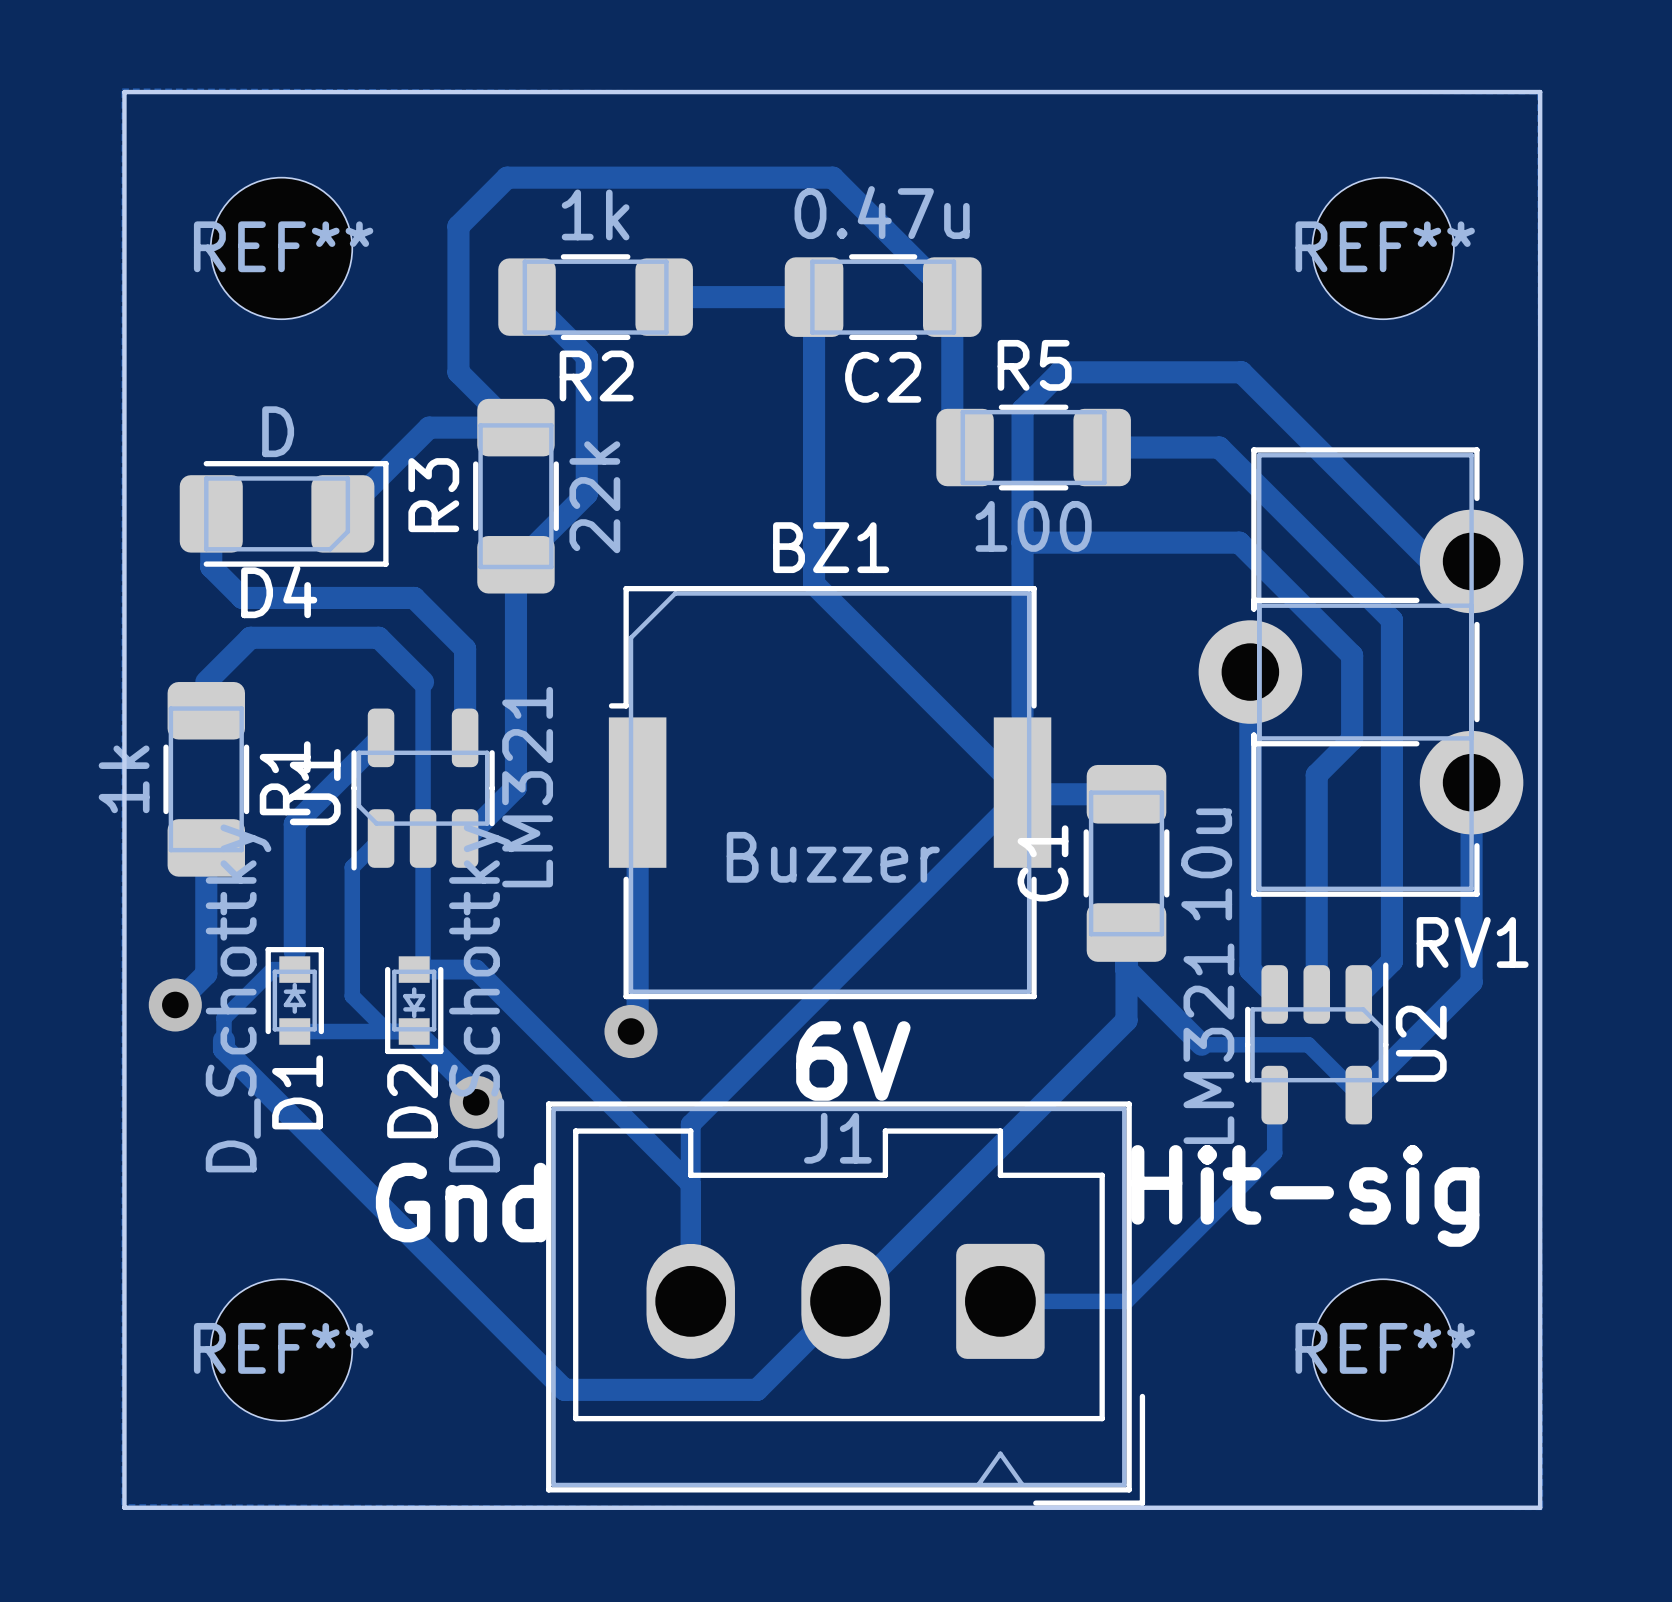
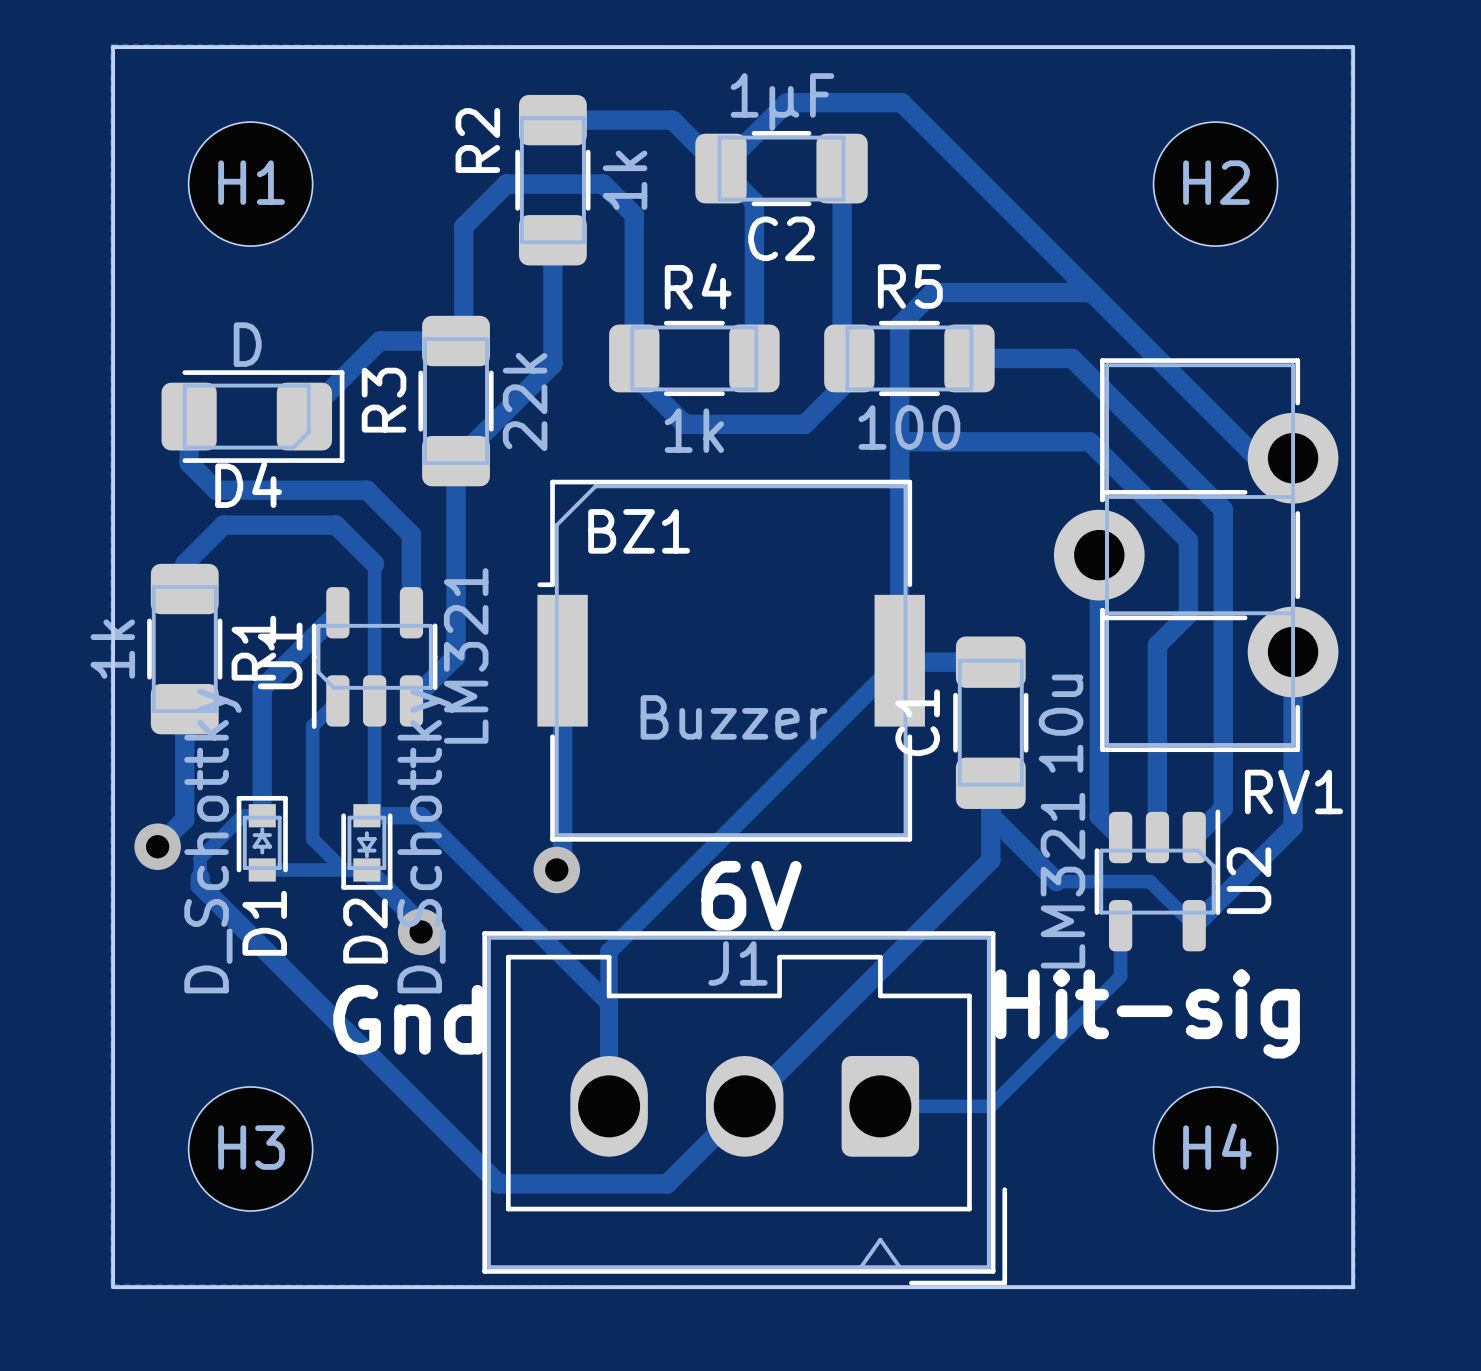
track: none -> (552, 120) (672, 120) (754, 201) (754, 358)
C2 value: 0.47u (882, 212) -> 1µF (782, 101)
track: none -> (720, 168) (786, 102) (901, 102) (1091, 292)
track: none -> (842, 168) (842, 351) (849, 358) (849, 379) (804, 424) (684, 424) (634, 373) (634, 215) (603, 184) (506, 184) (463, 226) (463, 333) (456, 341)
REF** name: REF** (283, 246) -> H1 (251, 182)
REF** name: REF** (1385, 246) -> H2 (1216, 182)
track: (527, 297) (586, 356) (586, 493) -> (552, 240) (552, 364) (518, 399)
R2 rotation: 0° (595, 297) -> 90° clockwise (552, 180)
track: (664, 297) (814, 297) (814, 584) (1022, 792) -> none
C2 position: (883, 297) -> (781, 168)
track: (513, 427) (458, 372) (458, 226) (507, 177) (832, 177) (952, 297) (952, 434) -> none
R4: none -> 1k (694, 358)
BZ1 name position: BZ1 (831, 547) -> BZ1 (639, 531)
REF** name: REF** (283, 1348) -> H3 (251, 1147)
REF** name: REF** (1385, 1348) -> H4 (1217, 1146)

